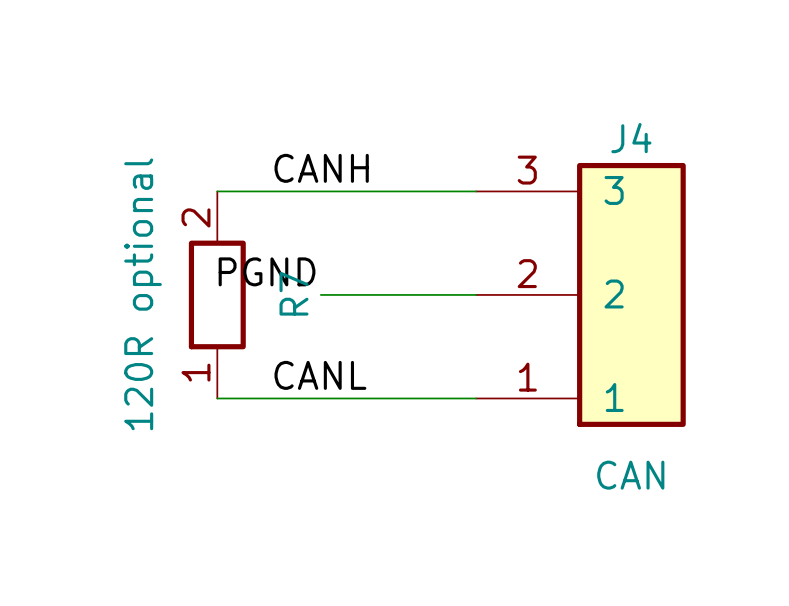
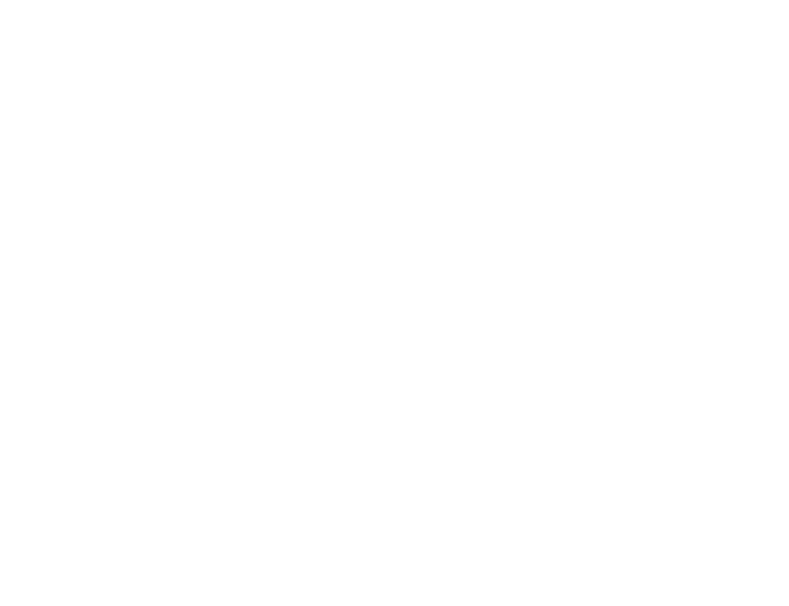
label: CANH (321, 168) -> none
wire: (217, 191) (476, 191) -> none
label: PGND (267, 271) -> none
R7: 120R optional (217, 294) -> none
wire: (320, 294) (476, 294) -> none
J4: CAN (580, 294) -> none
label: CANL (320, 375) -> none
wire: (217, 398) (476, 398) -> none

